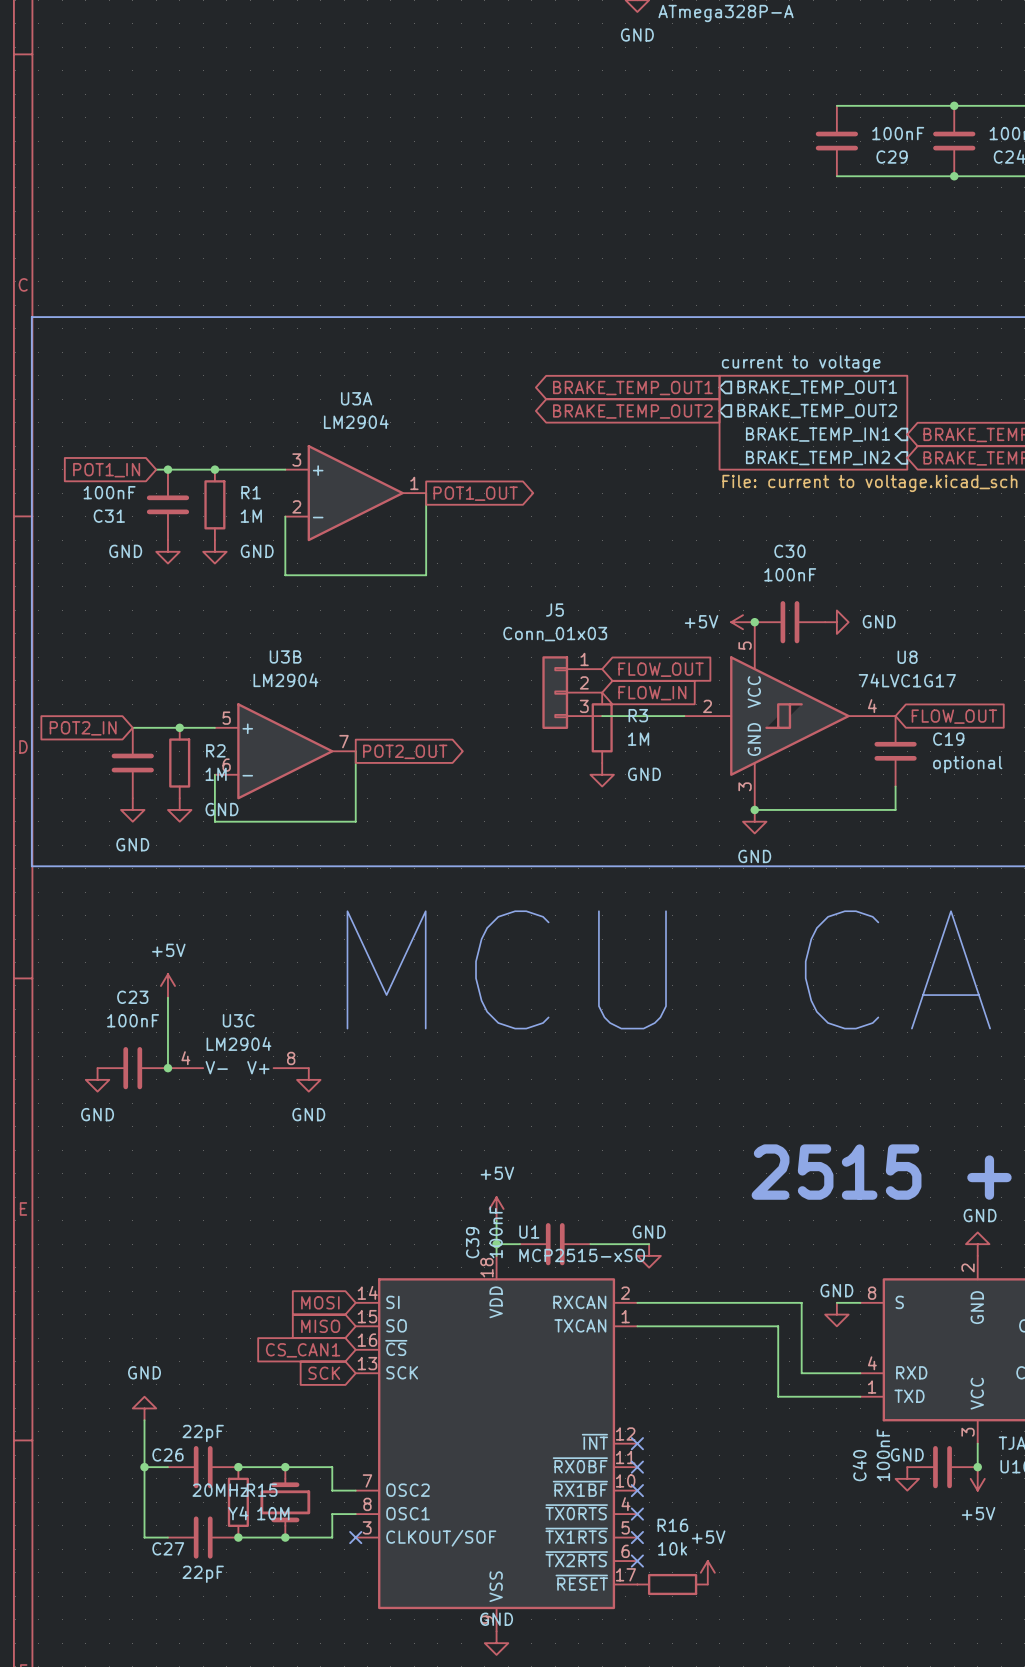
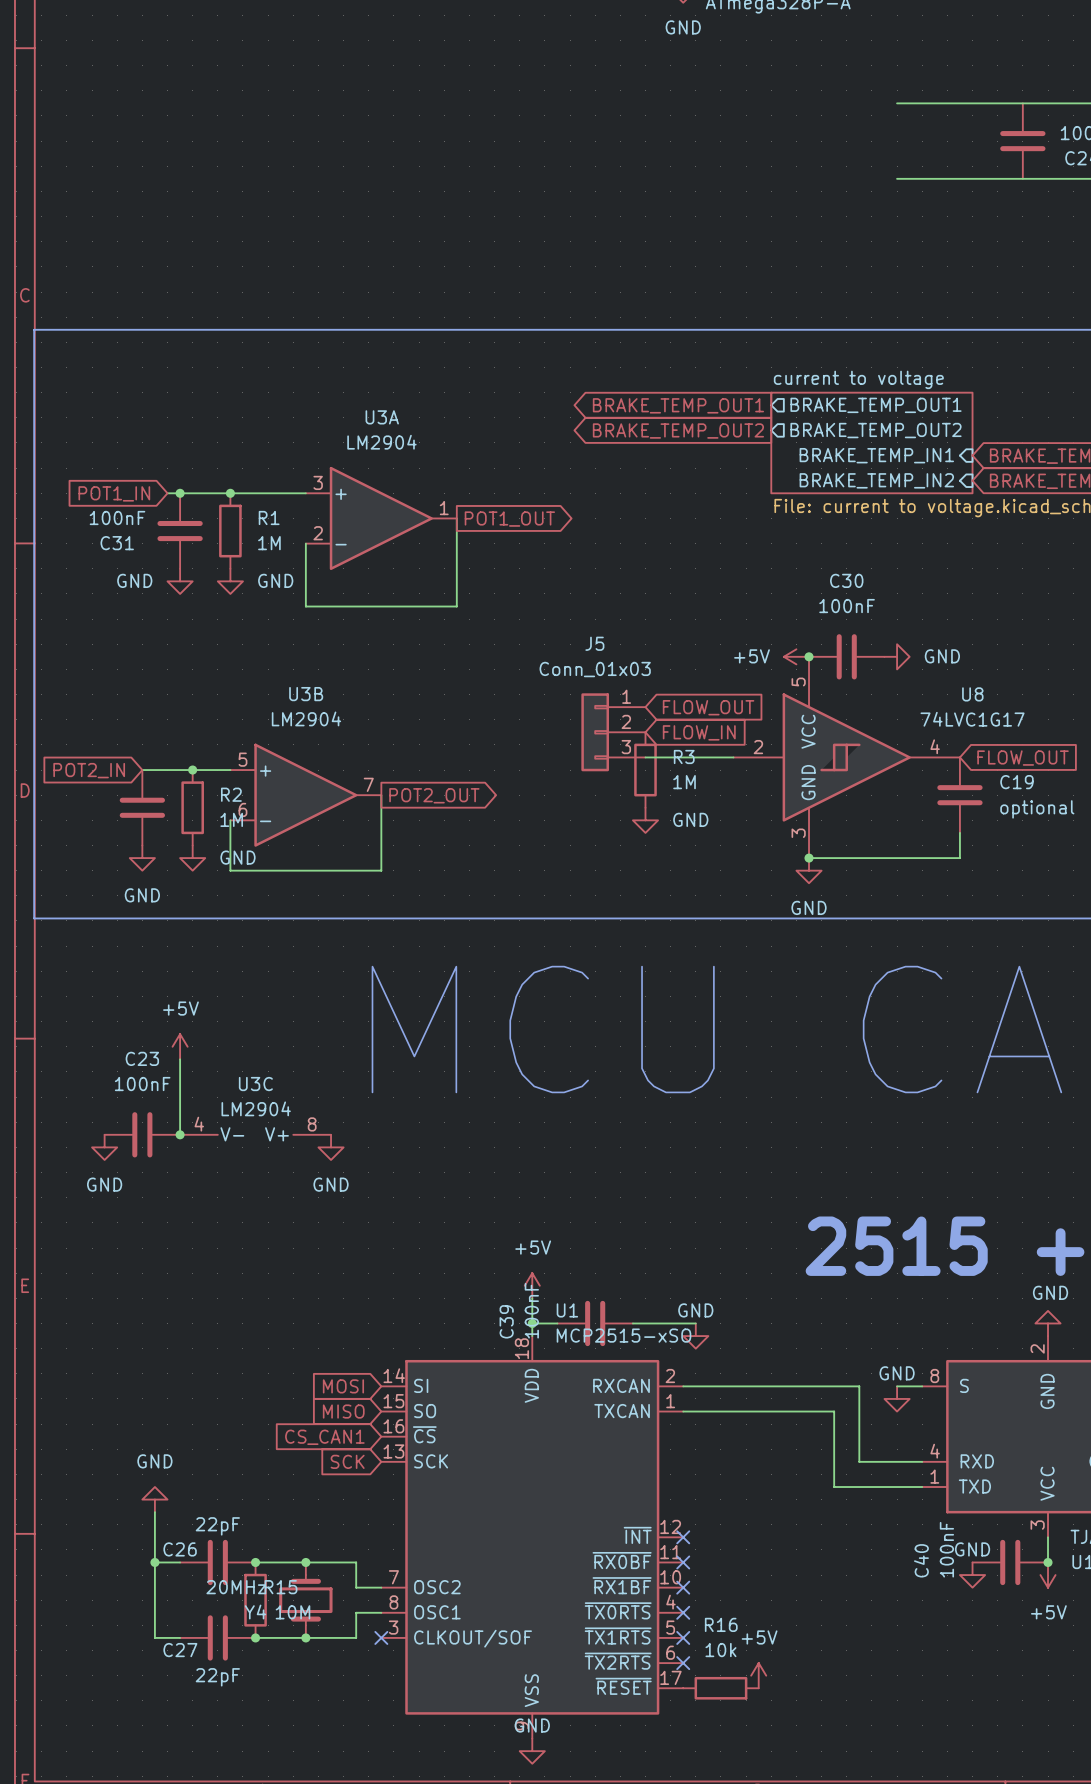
junction: (954, 105) -> none
C29: 100nF (836, 141) -> none
junction: (954, 176) -> none

